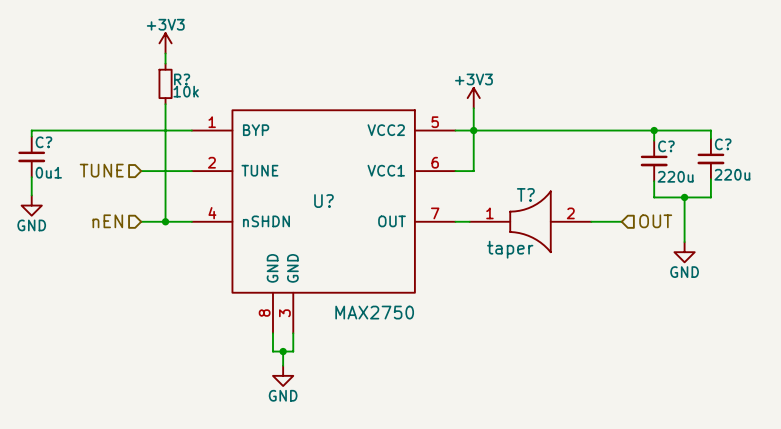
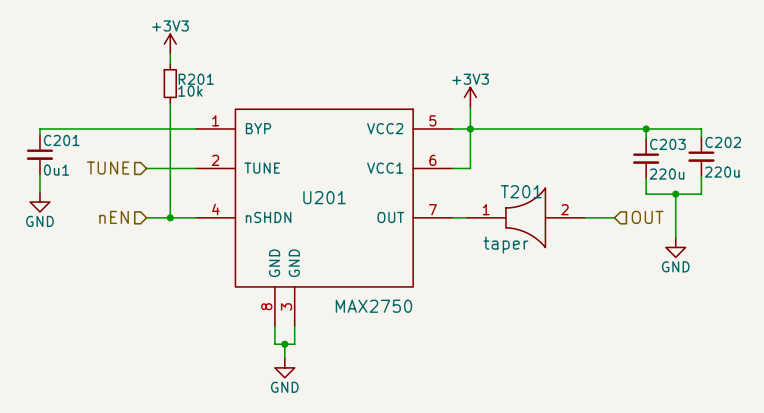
R? name: R? (182, 79) -> R201 (196, 79)
C? name: C? (43, 142) -> C201 (61, 140)
C? name: C? (723, 144) -> C202 (723, 142)
C? name: C? (666, 146) -> C203 (667, 144)
T? name: T? (525, 194) -> T201 (521, 191)
U? name: U? (323, 201) -> U201 (324, 197)

